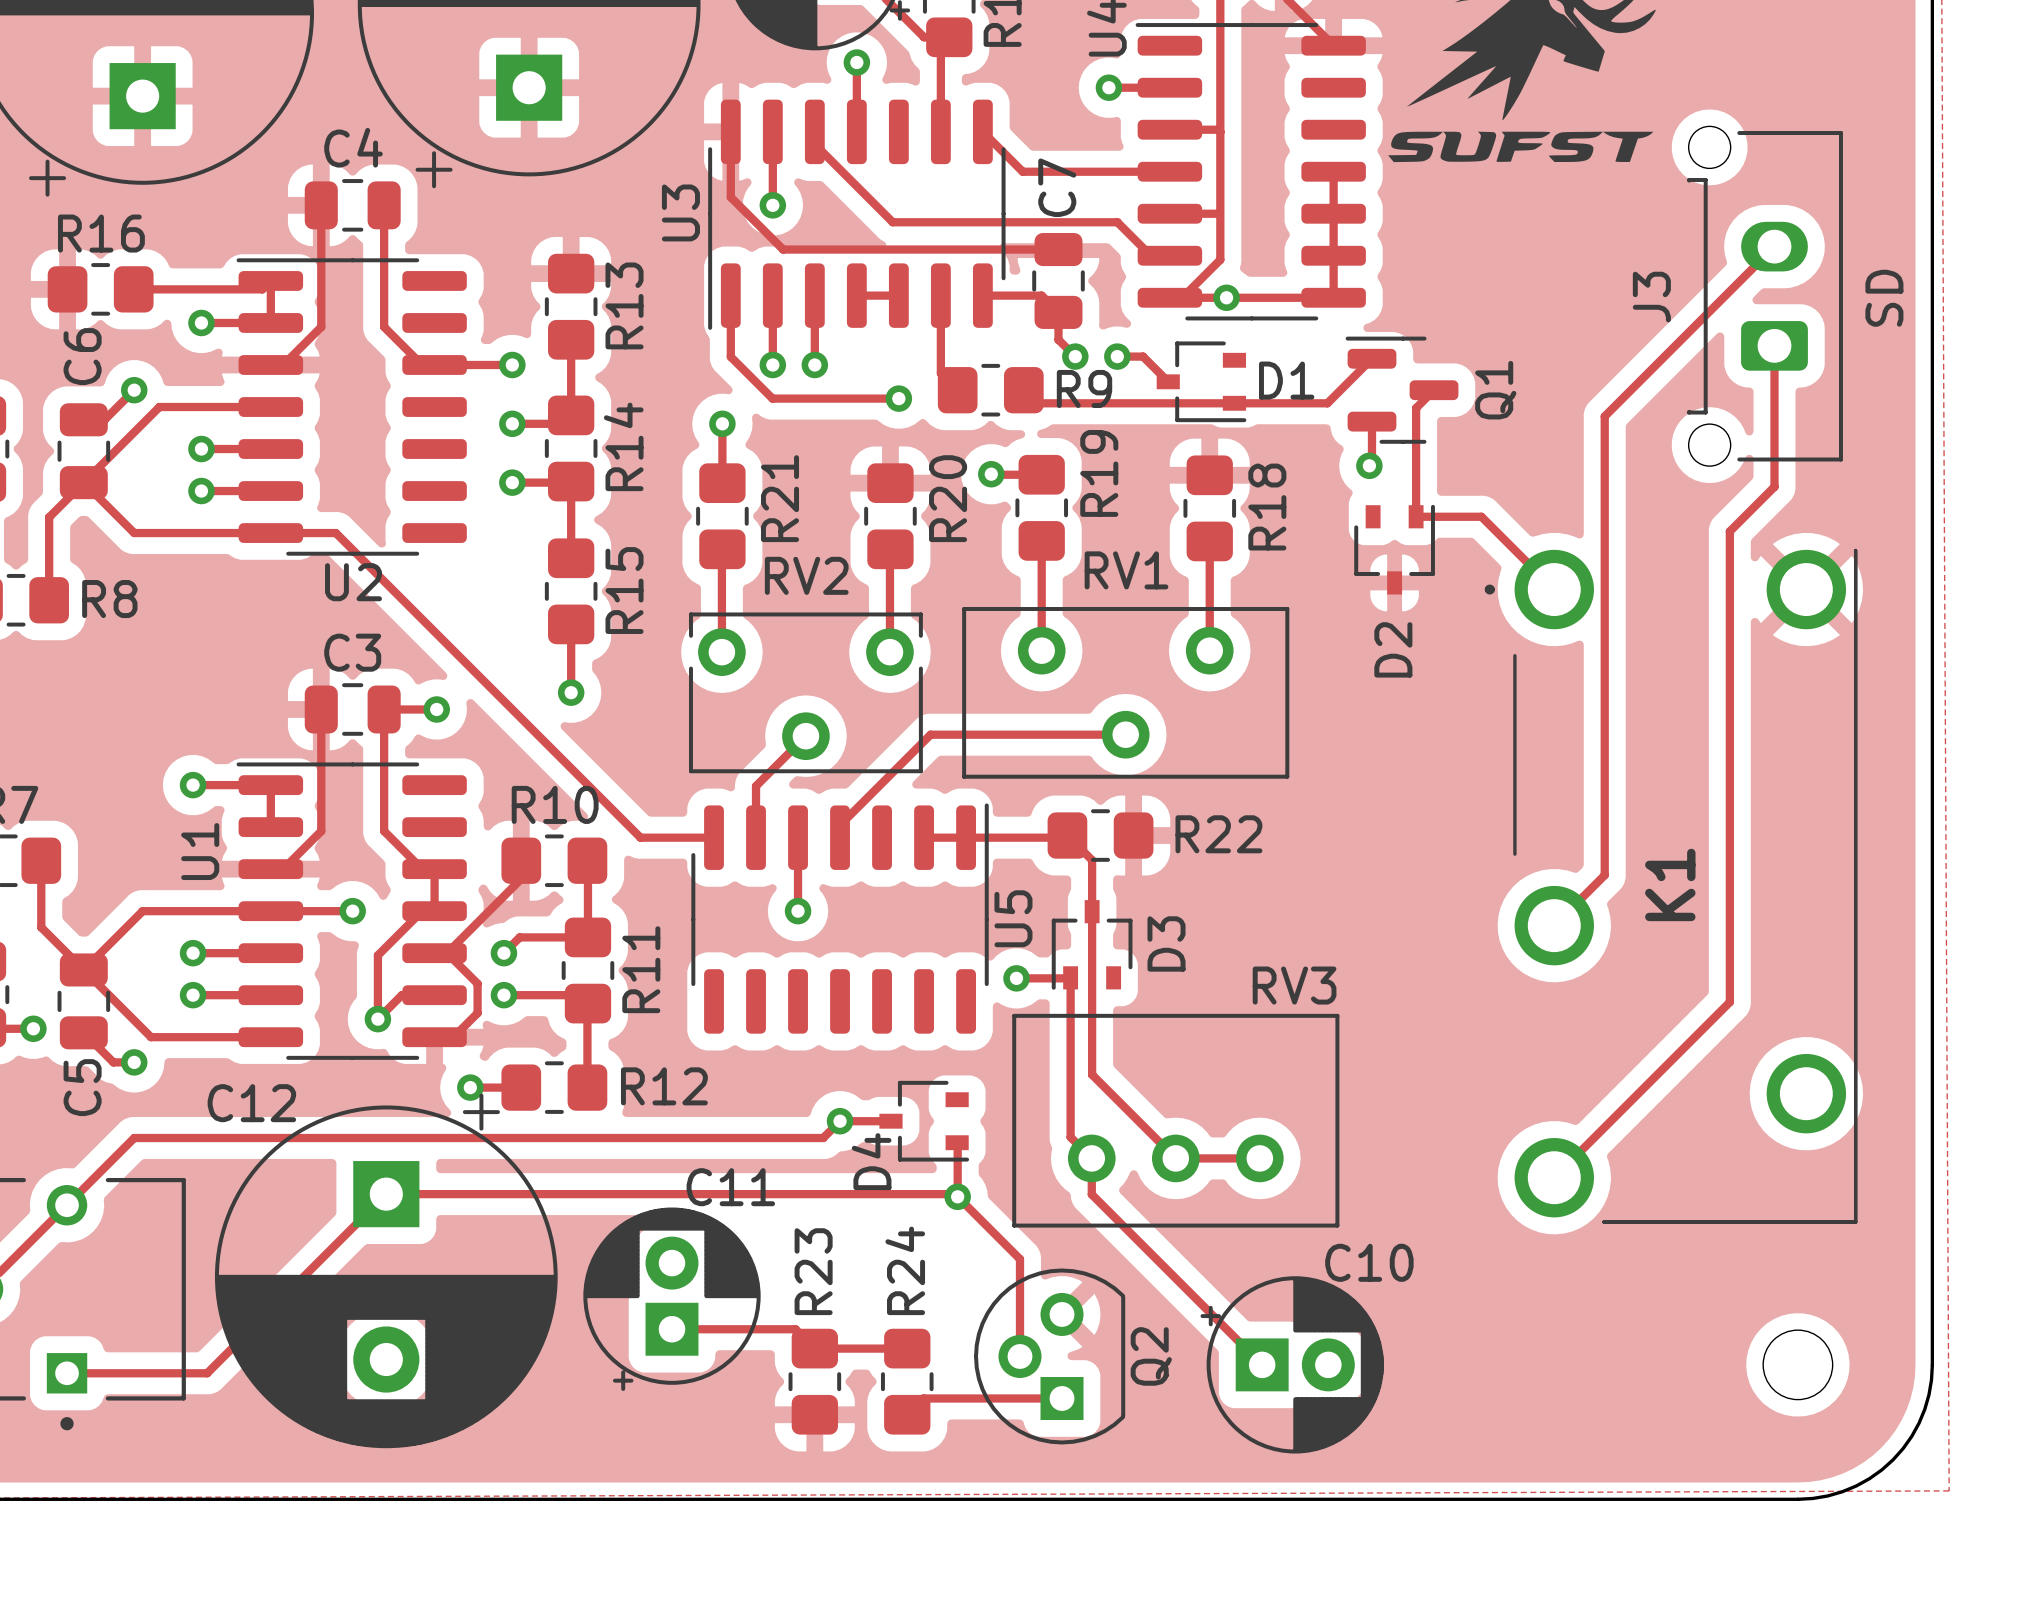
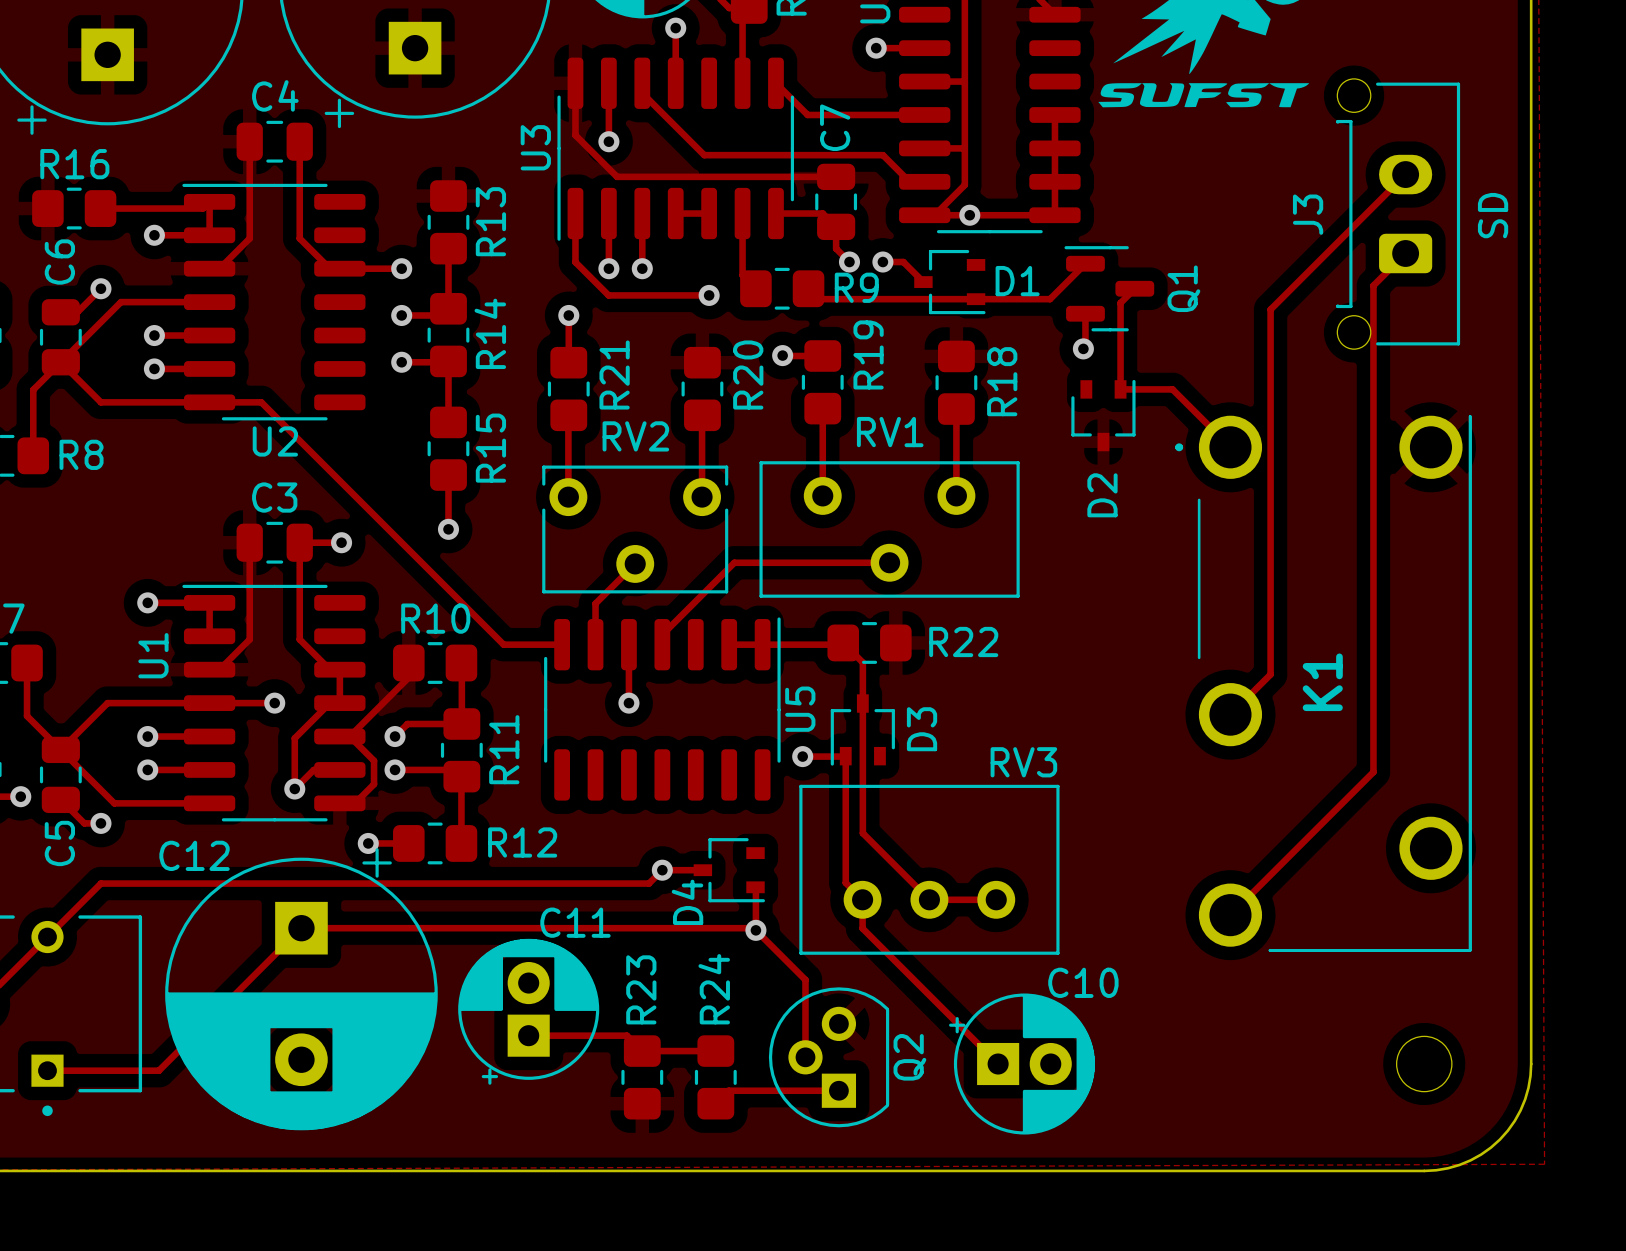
track: (1774, 345) (1774, 486) (1729, 531) (1729, 1002) -> (1405, 253) (1373, 285) (1373, 772) (1370, 775)

